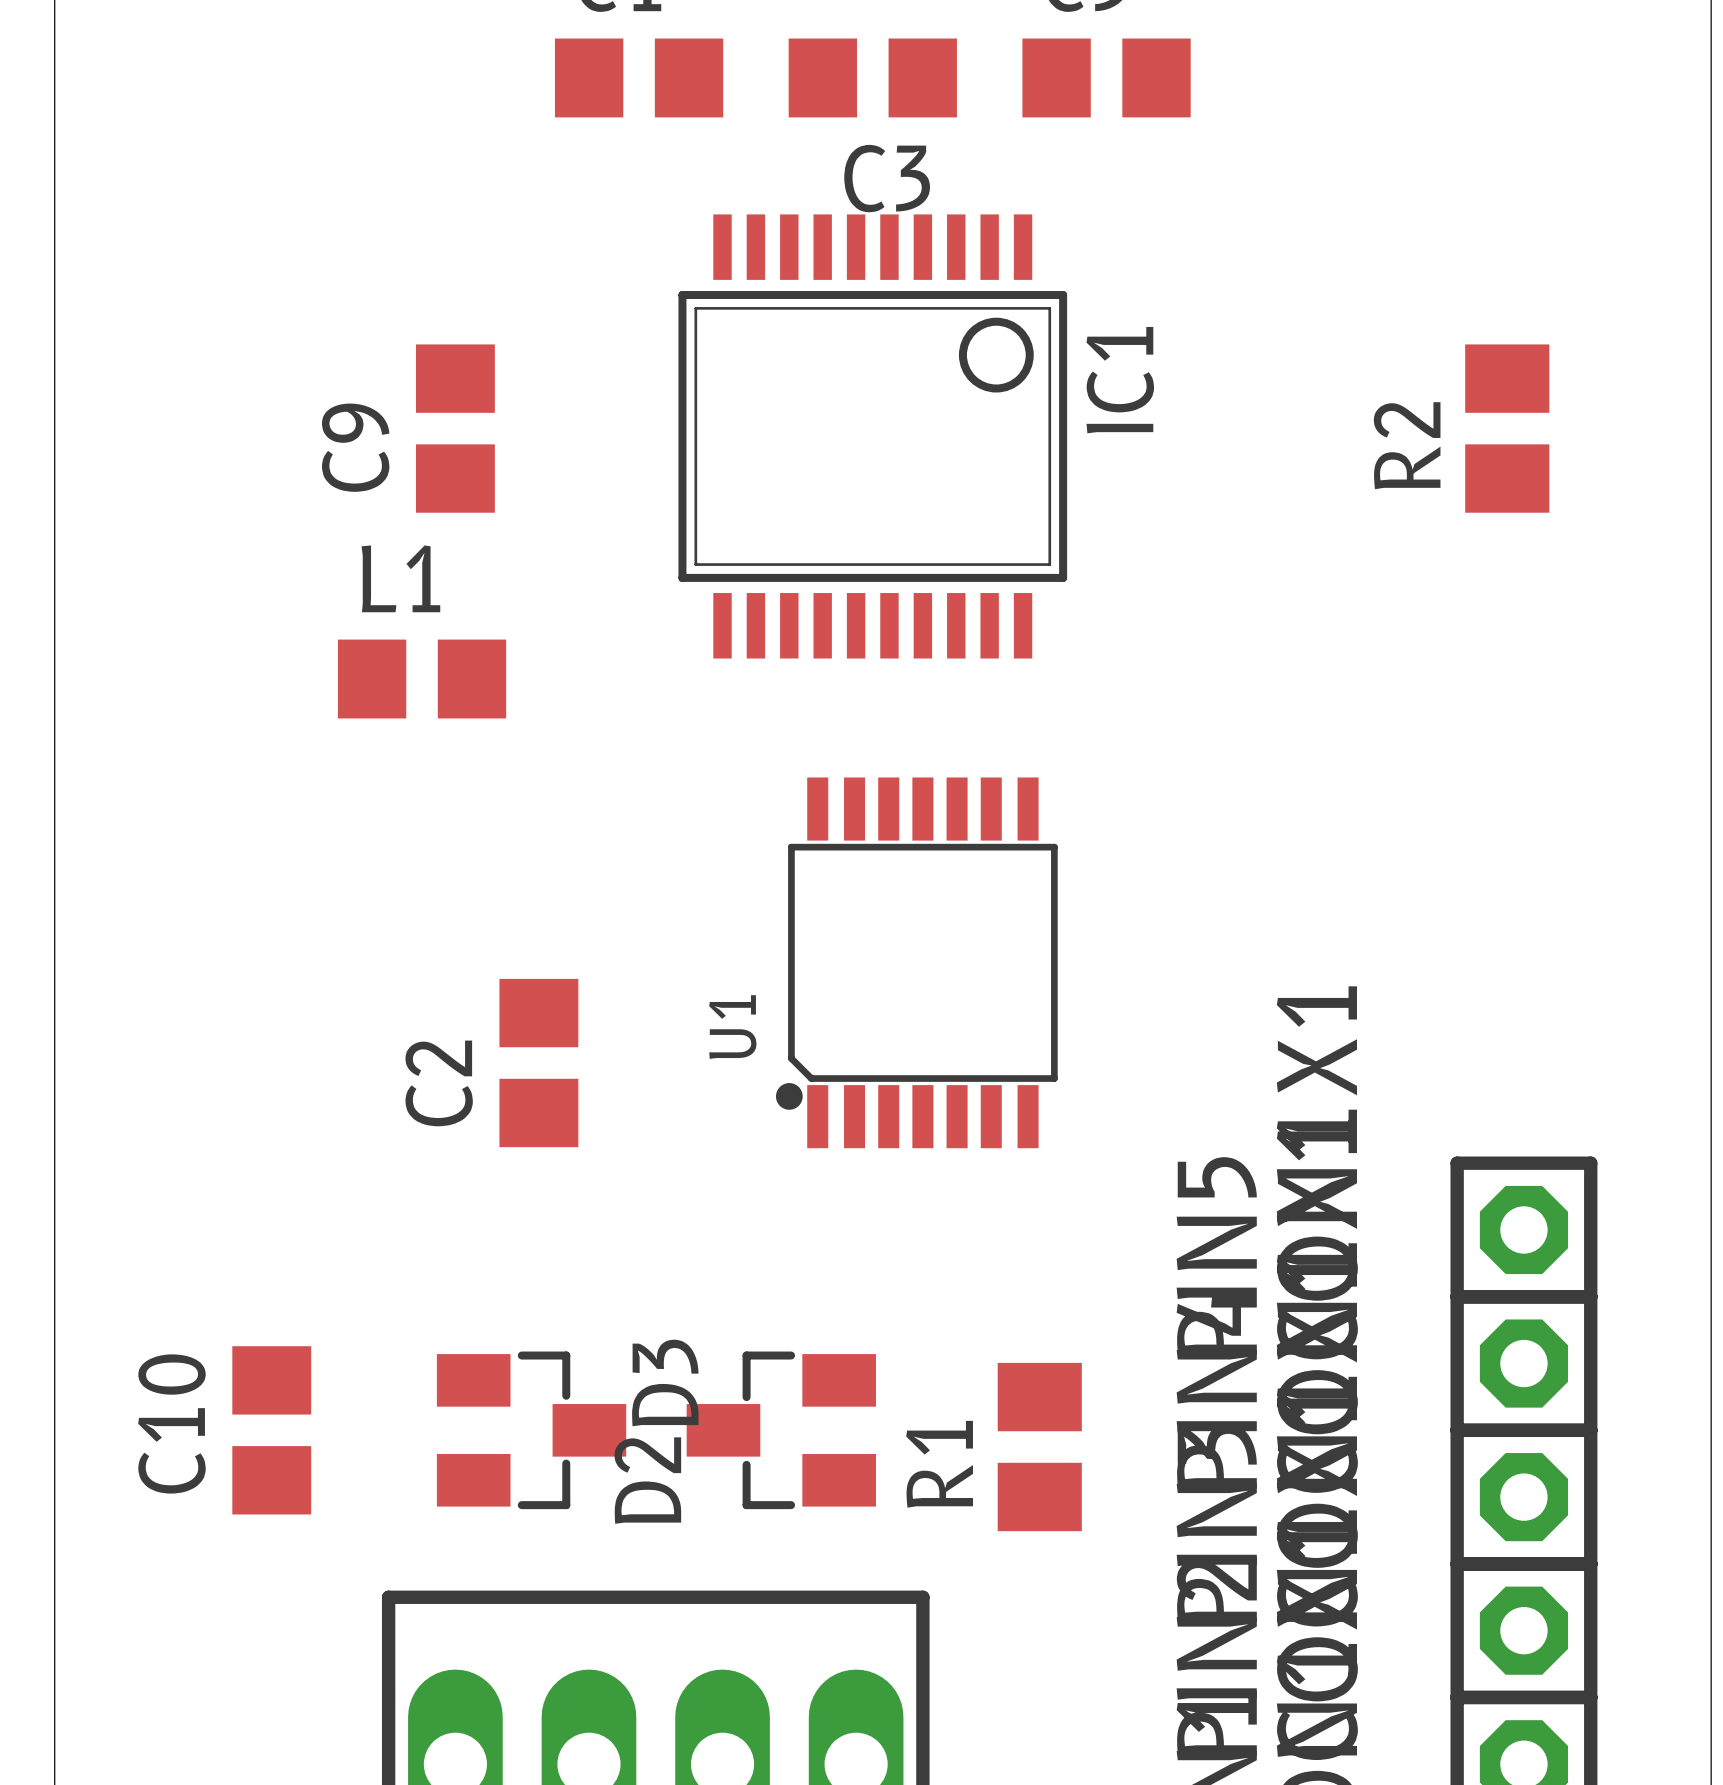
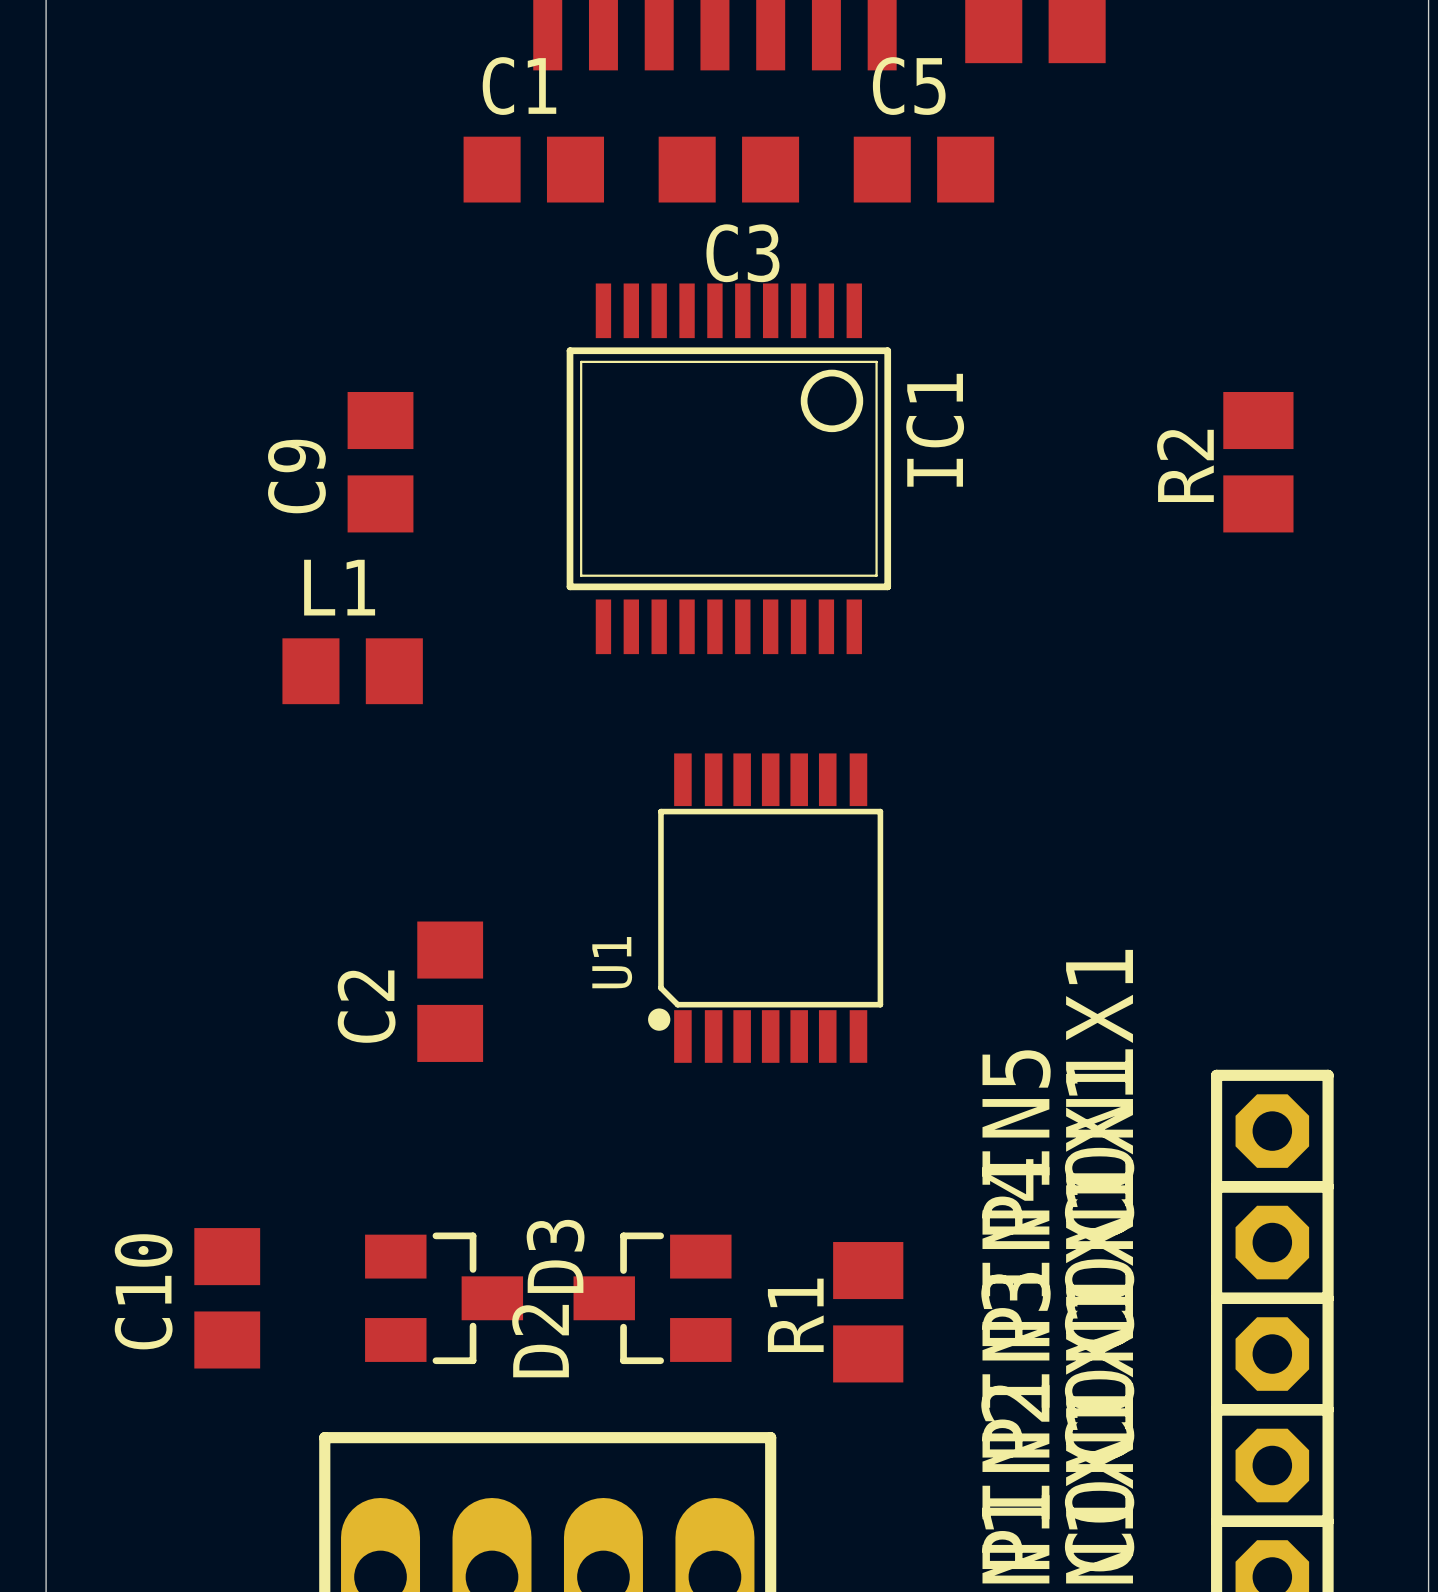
R2 name position: R2 (1407, 445) -> R2 (1185, 465)
R1 name position: R1 (939, 1464) -> R1 (795, 1315)

